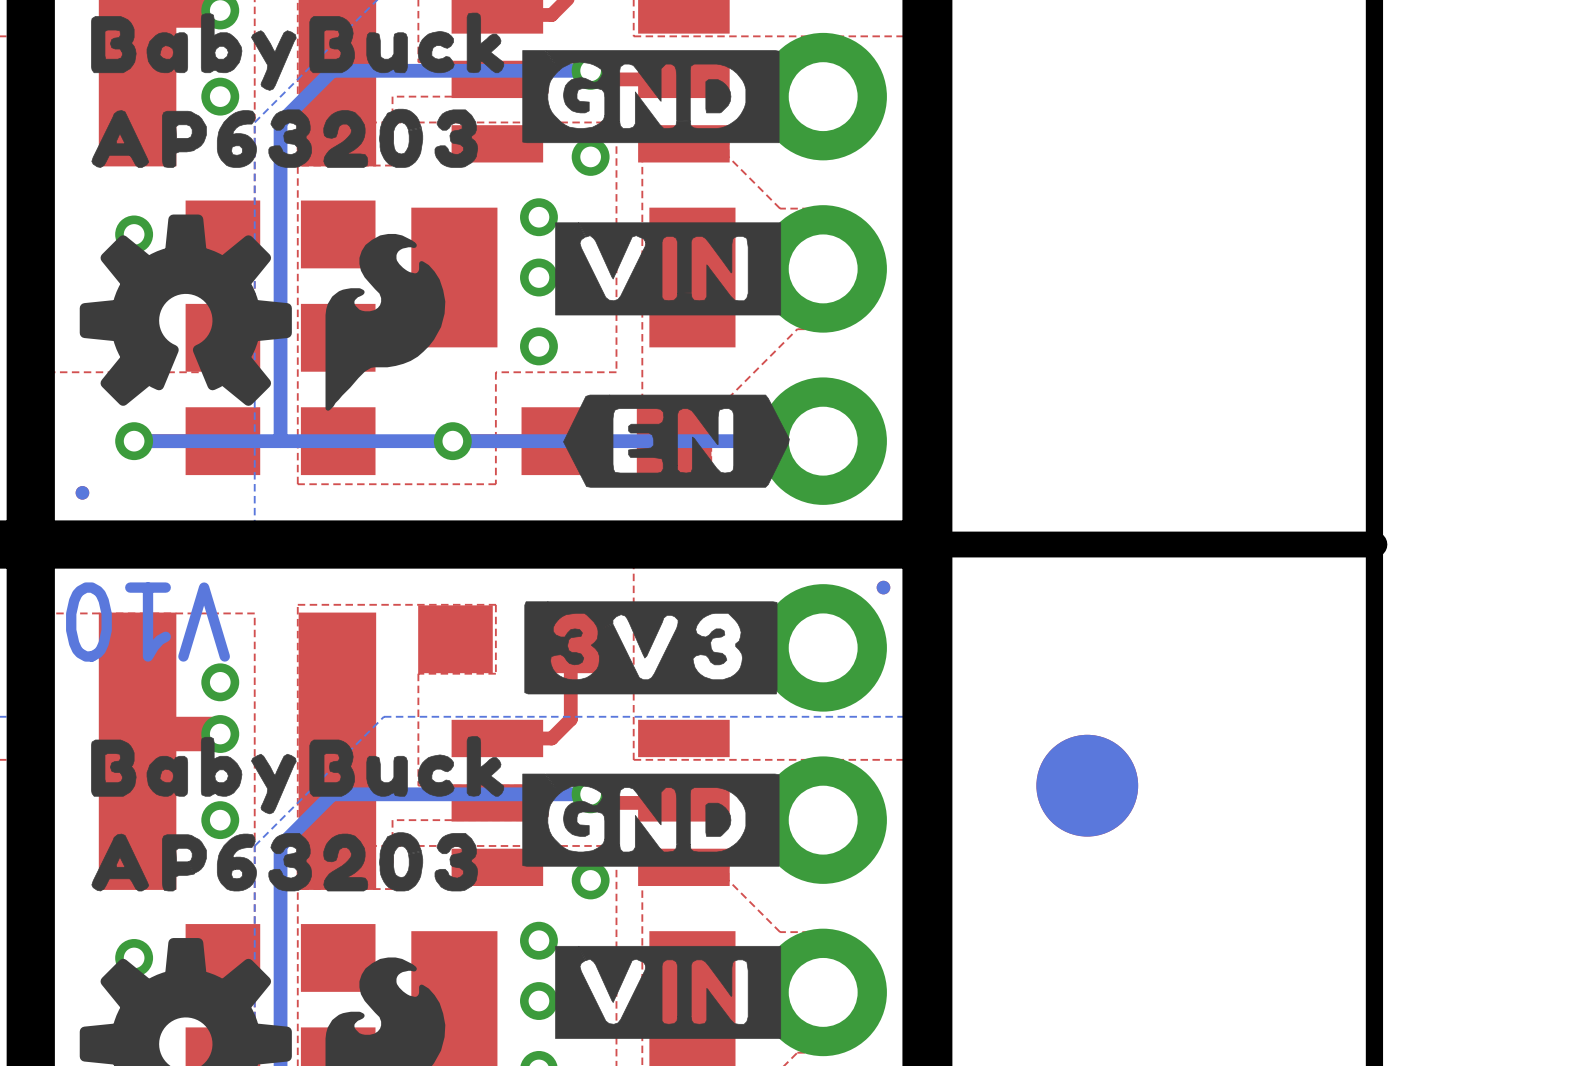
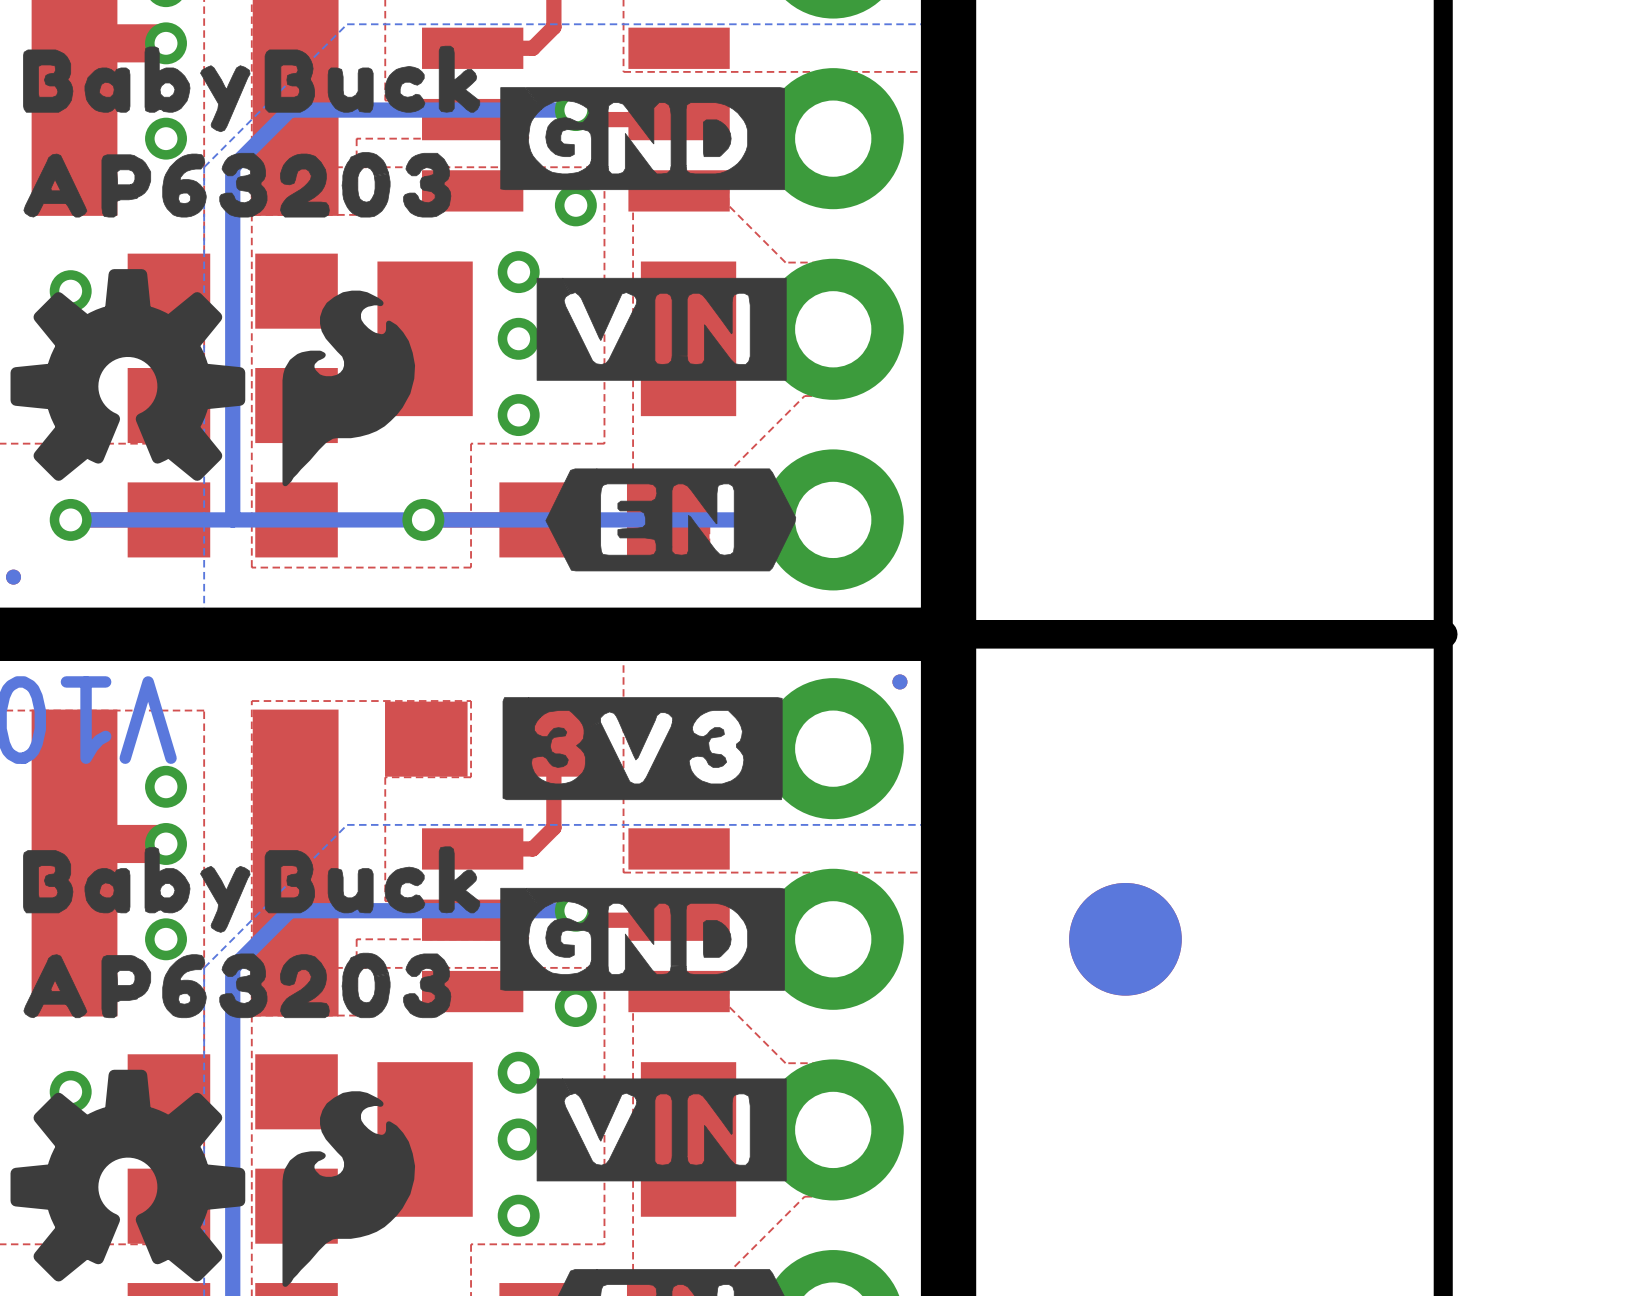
part position: (1087, 785) -> (1125, 939)

